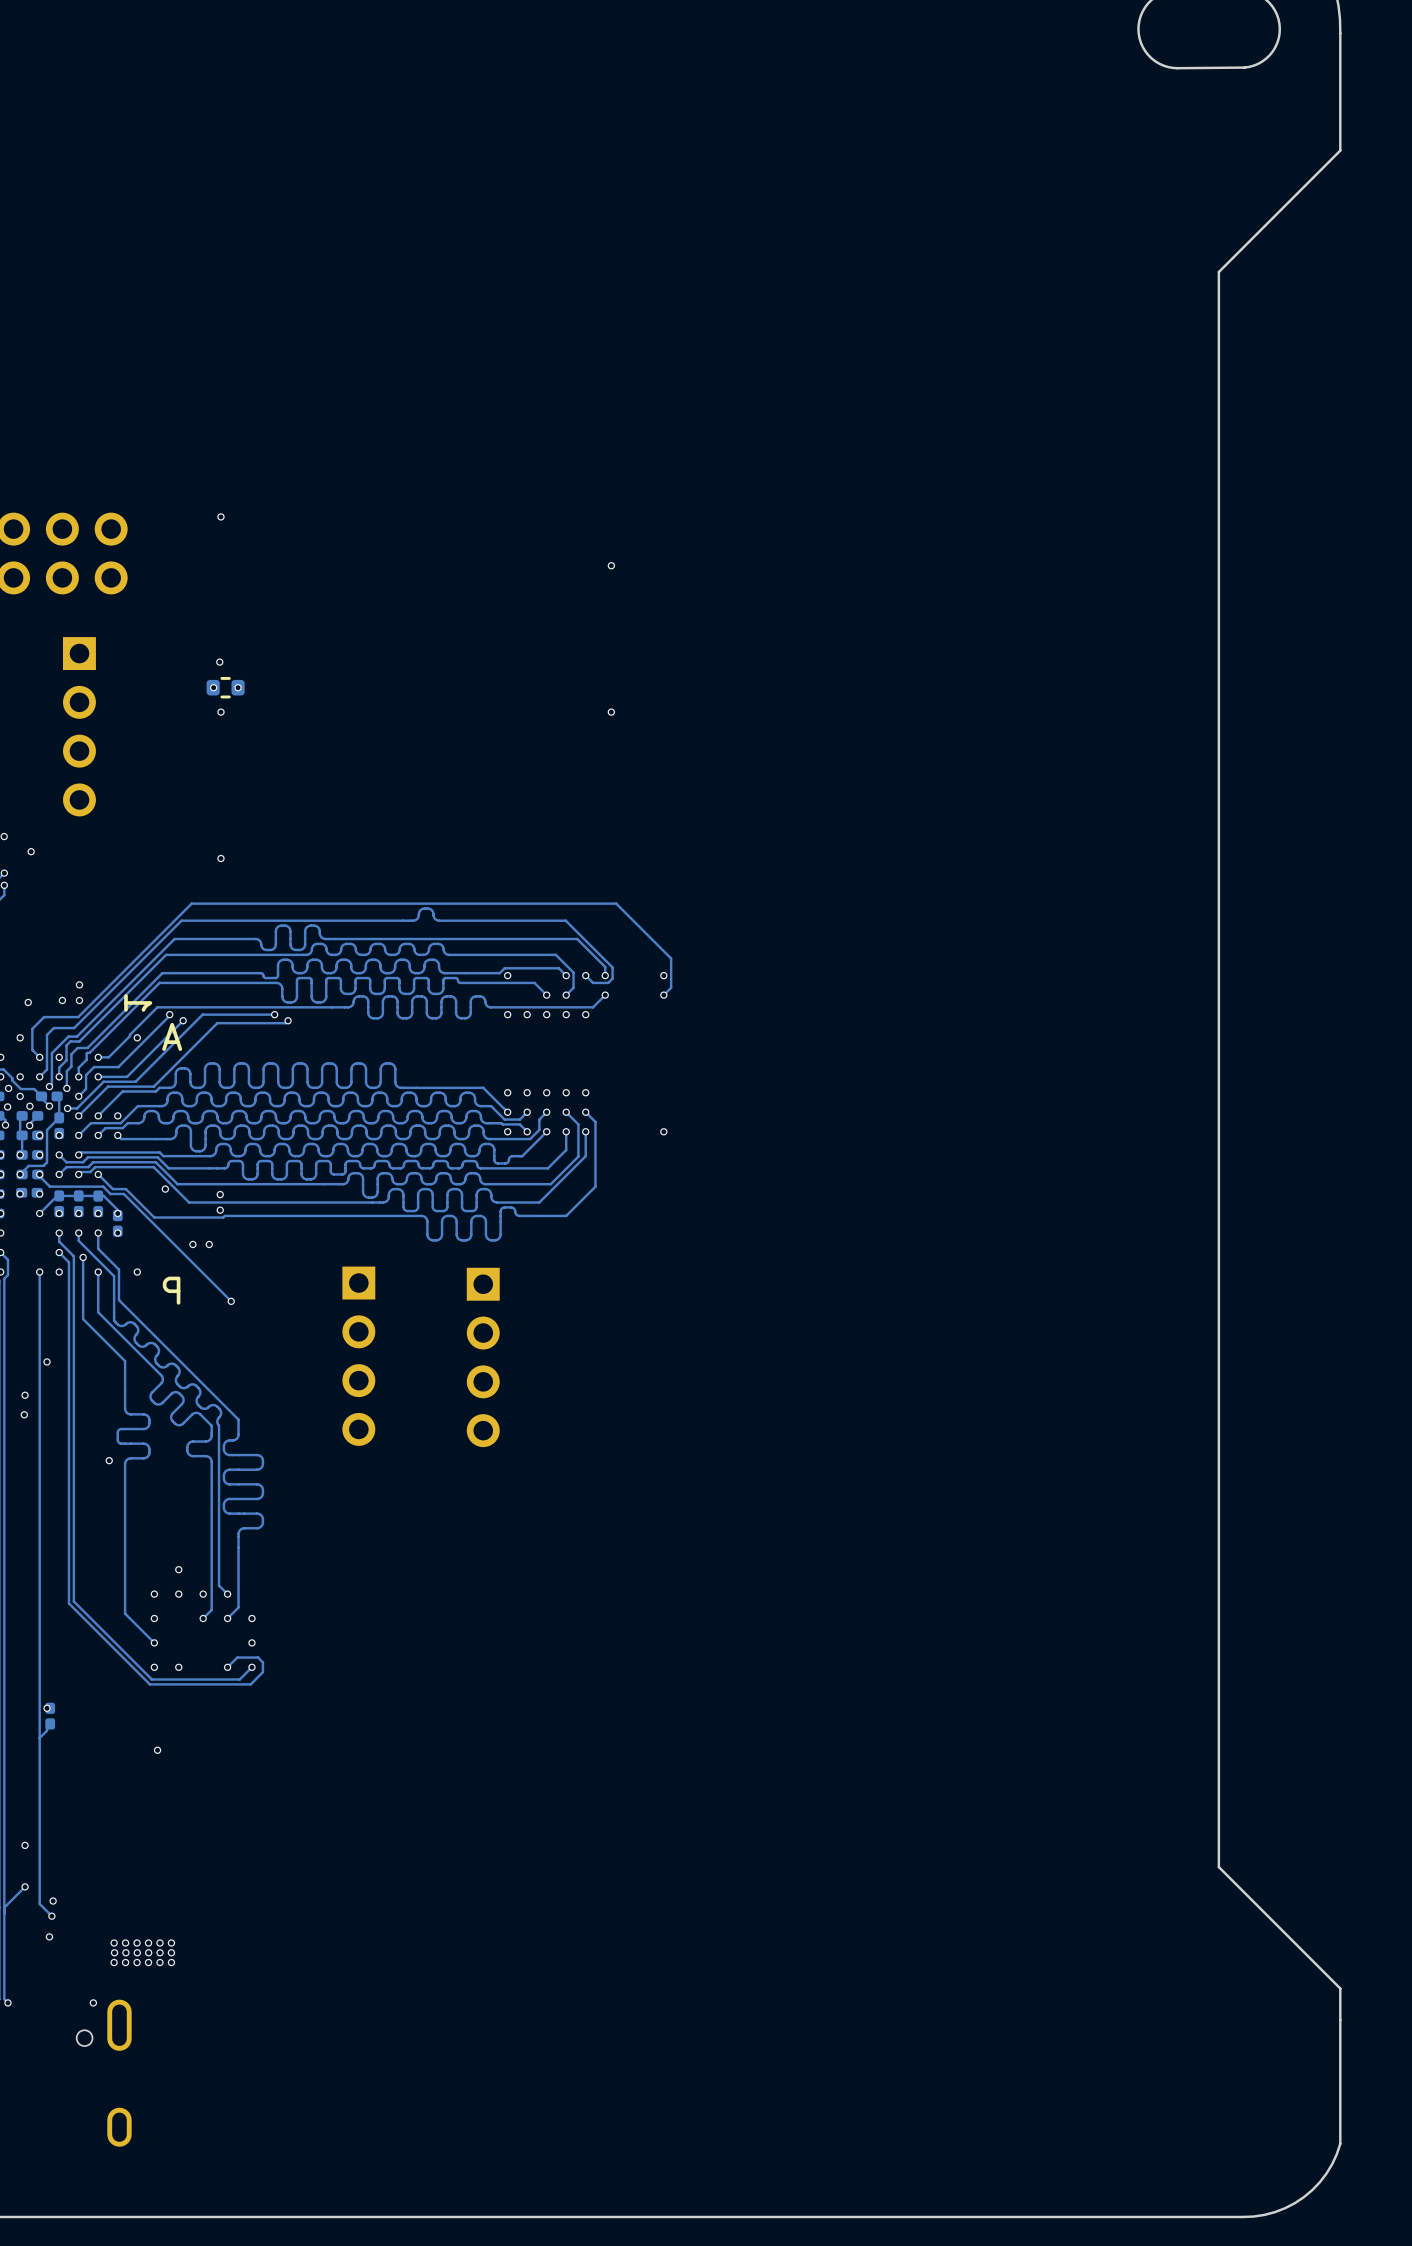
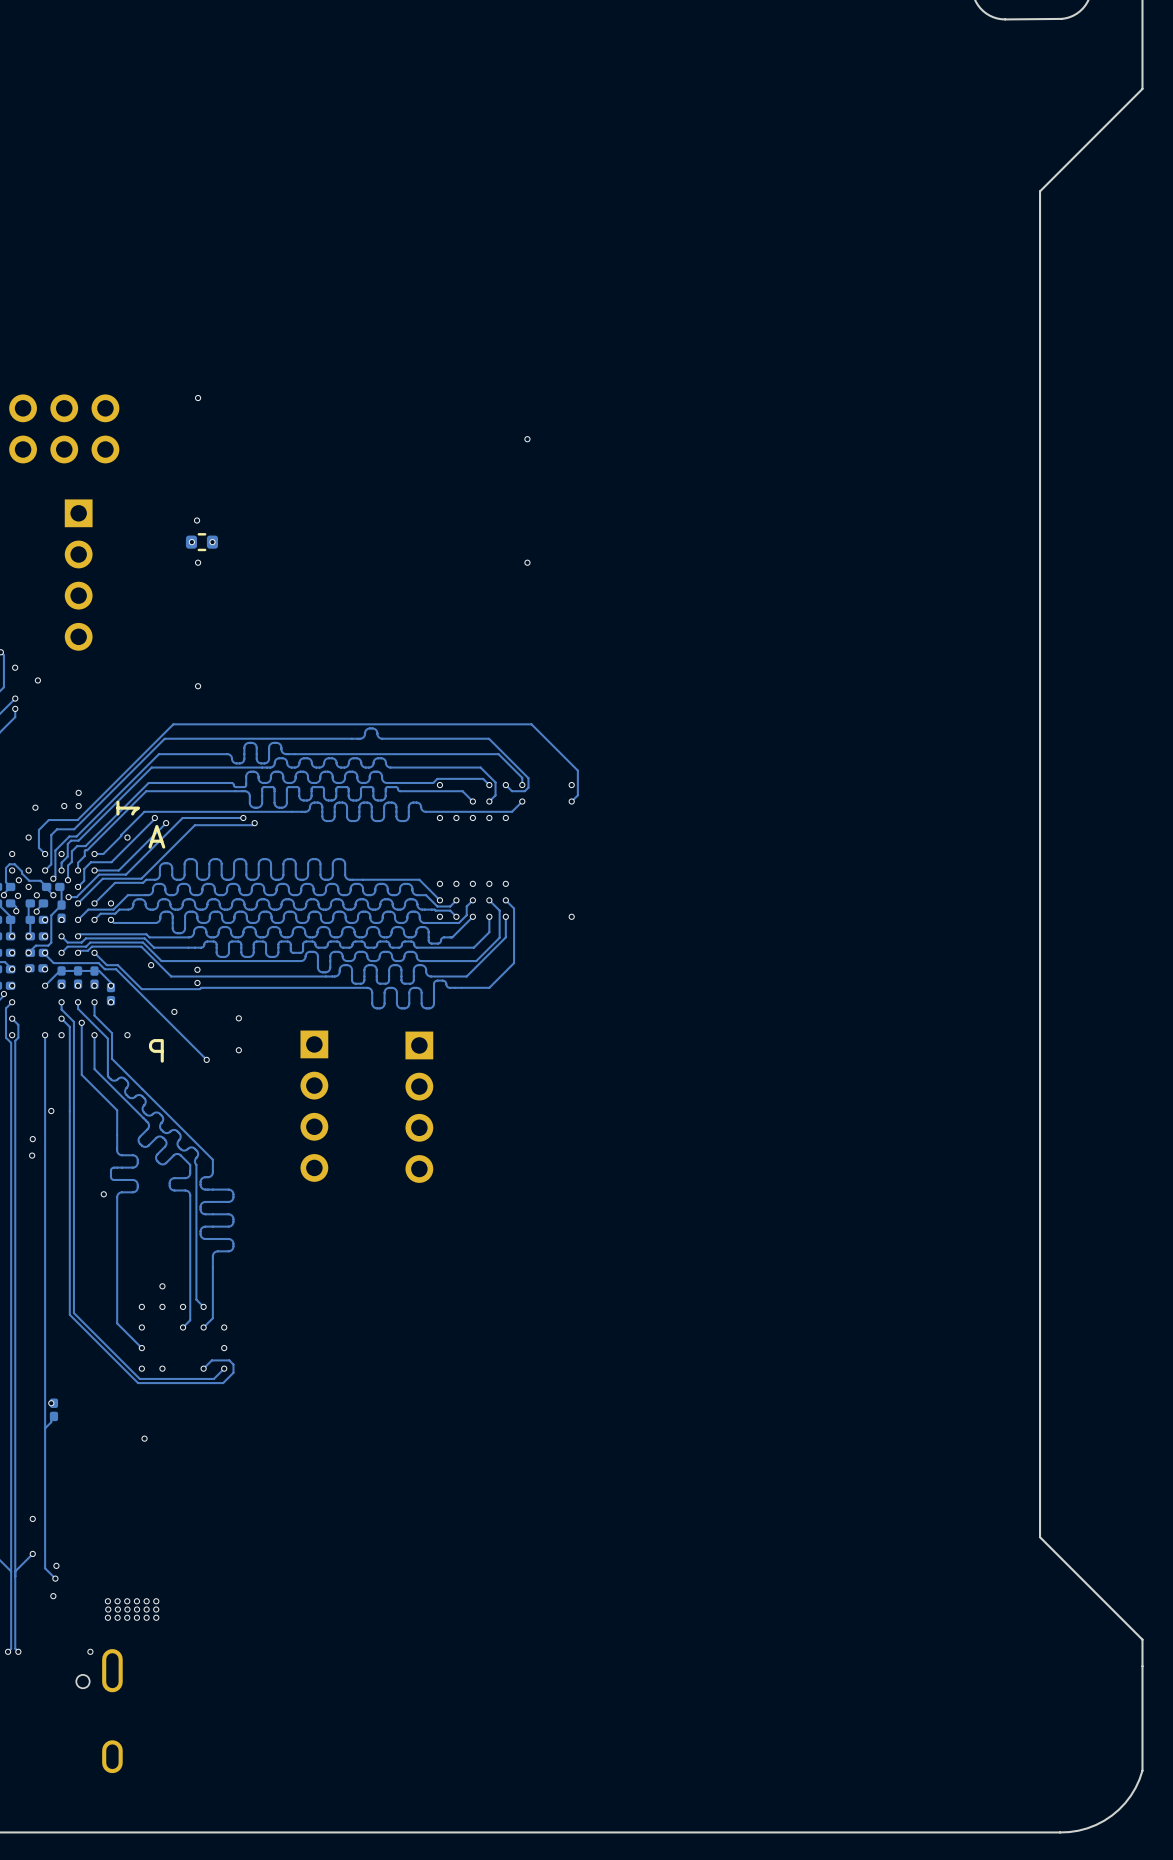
via: (209, 1244) -> none
via: none -> (238, 1018)
via: none -> (238, 1050)

